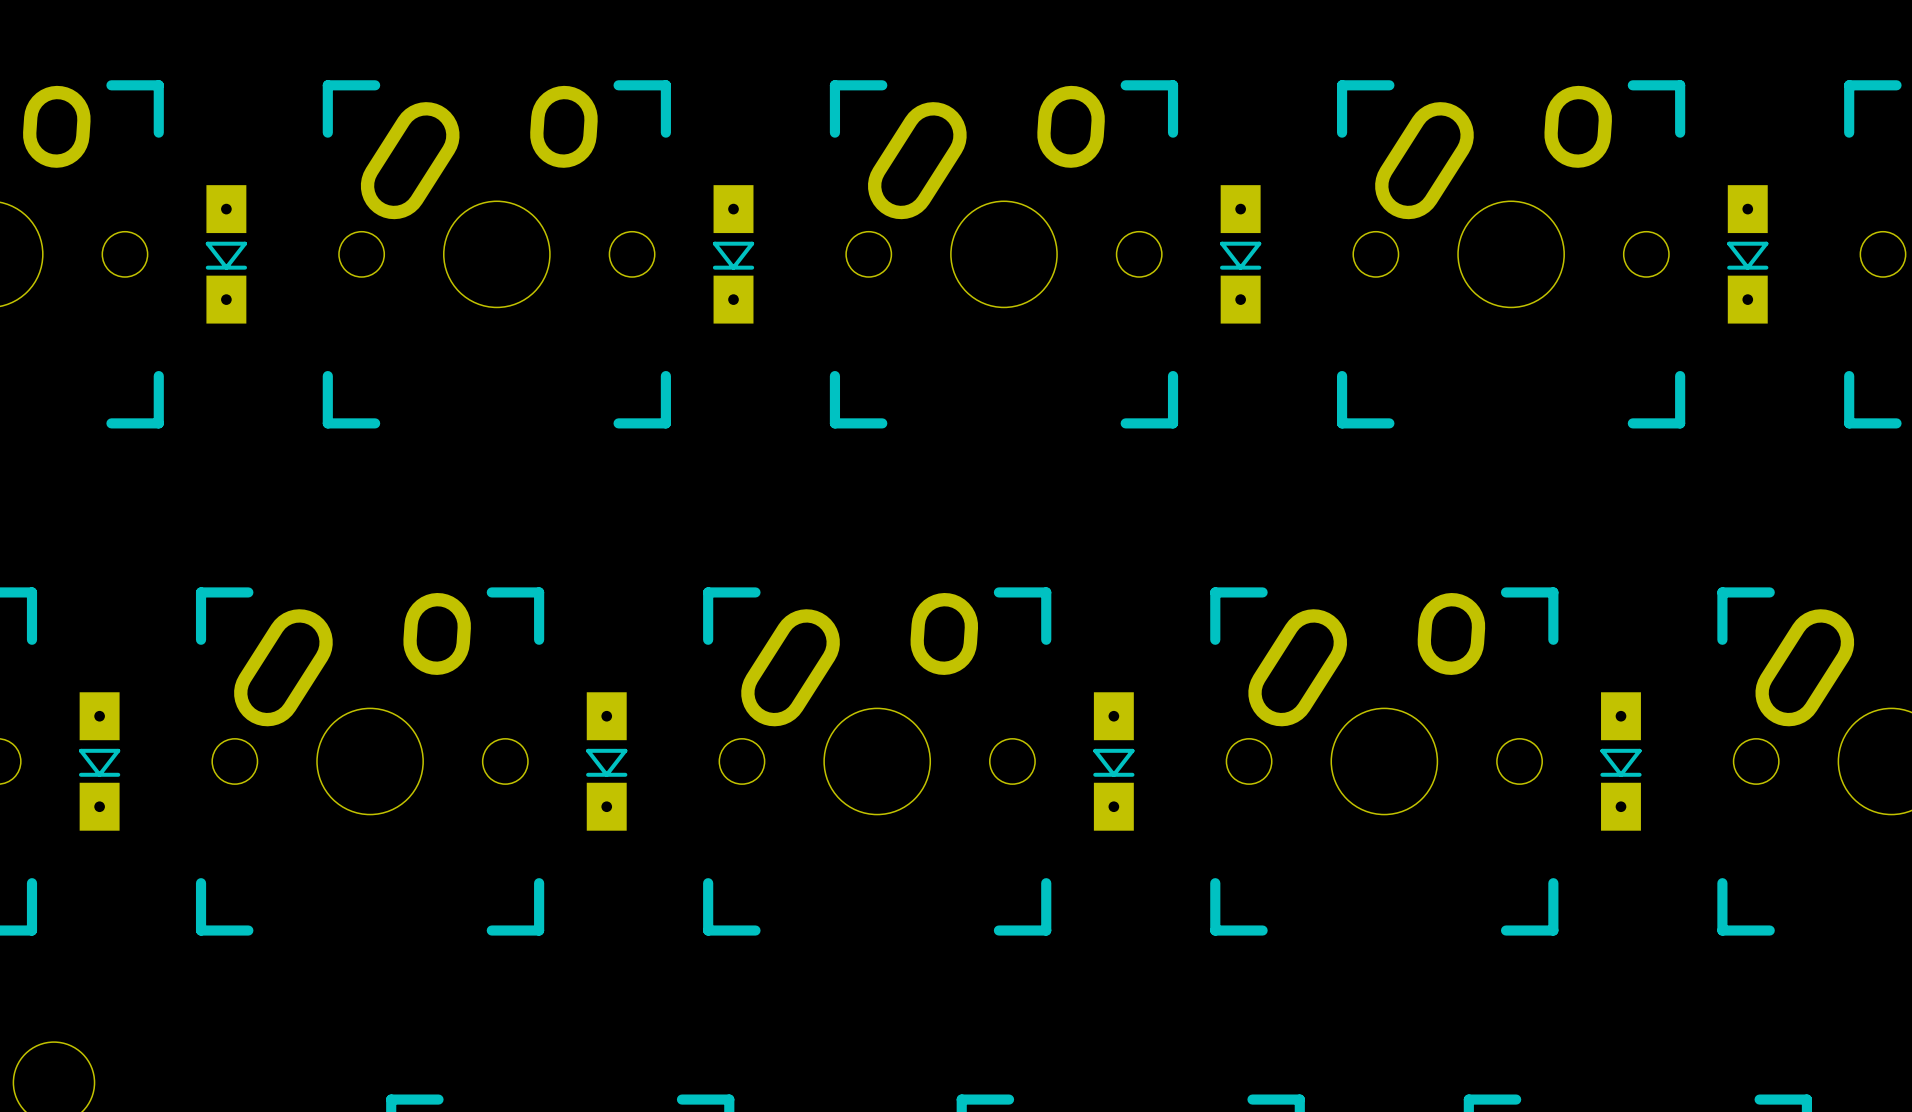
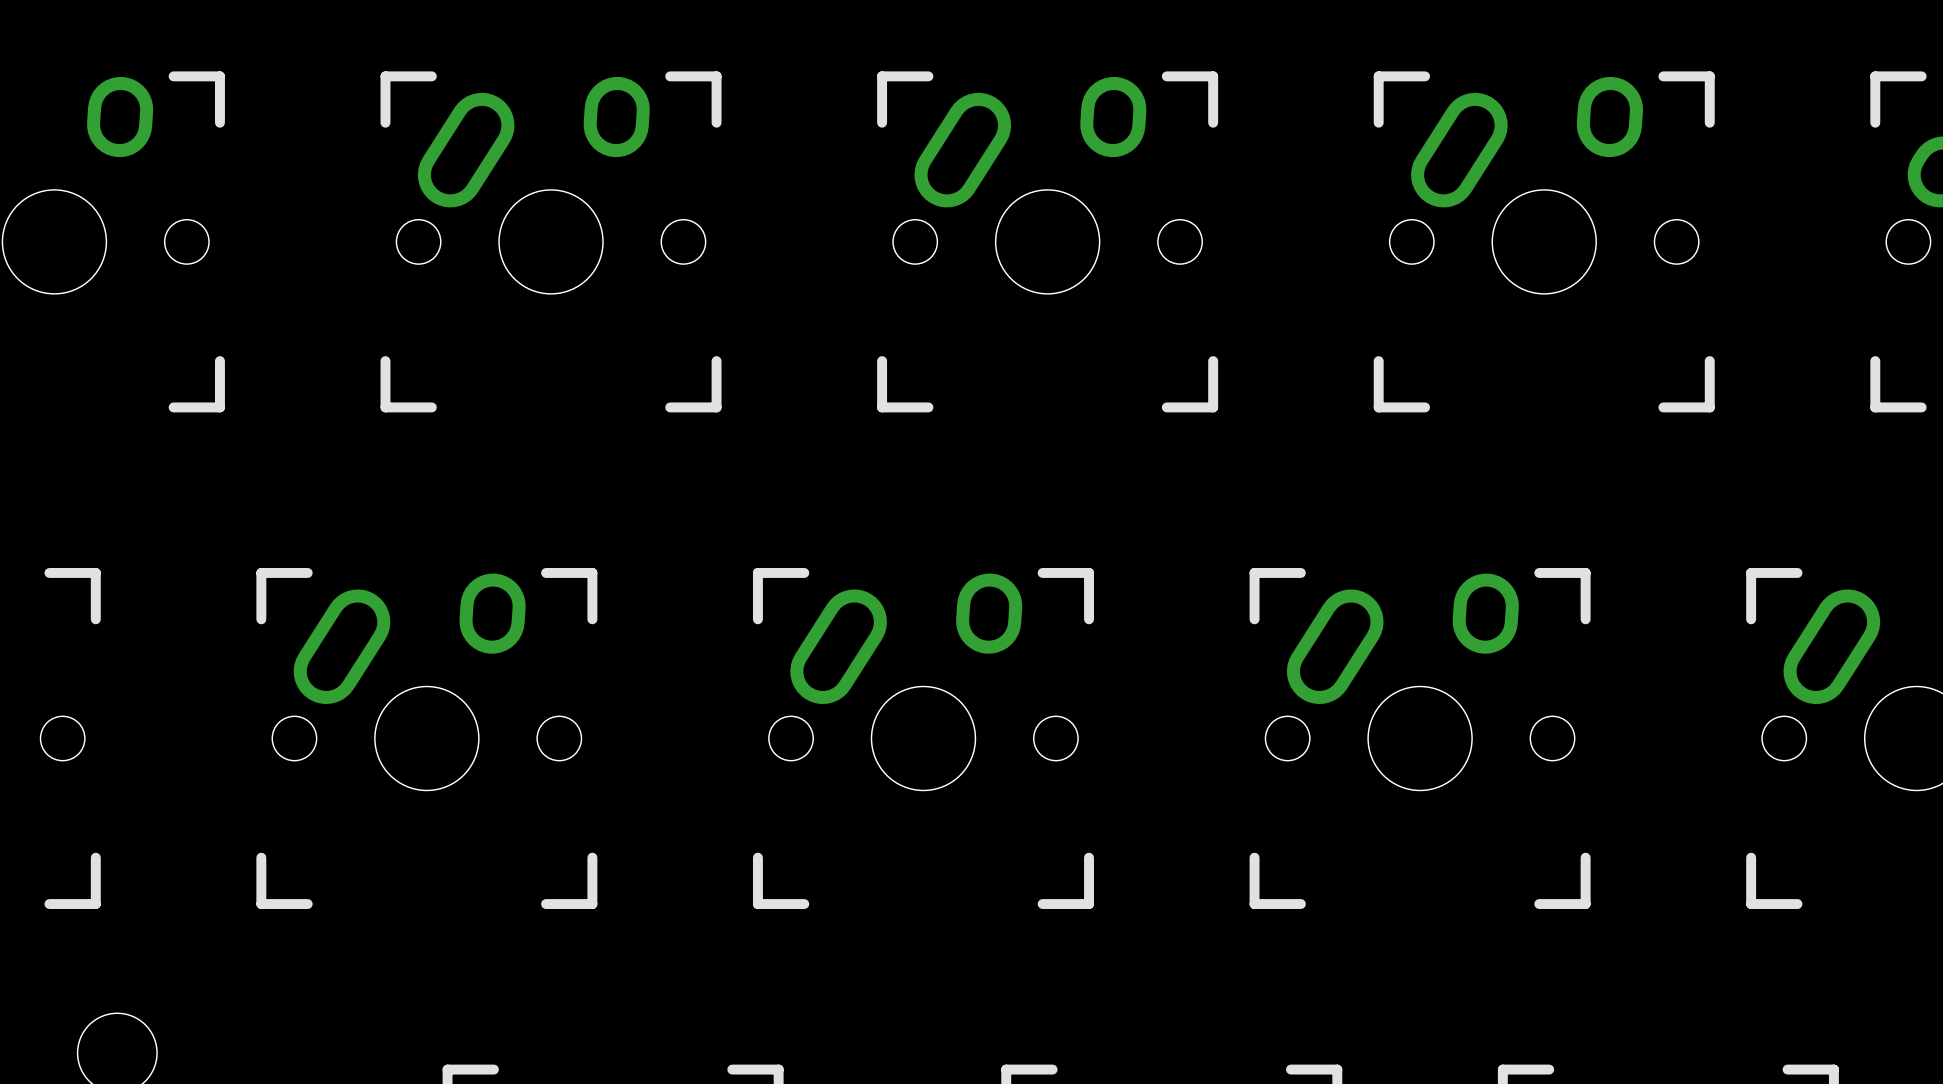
part: (226, 254) -> none
part: (733, 254) -> none
part: (1240, 254) -> none
part: (1747, 254) -> none
part: (99, 761) -> none
part: (606, 761) -> none
part: (1113, 761) -> none
part: (1620, 761) -> none

